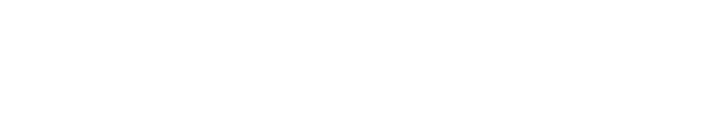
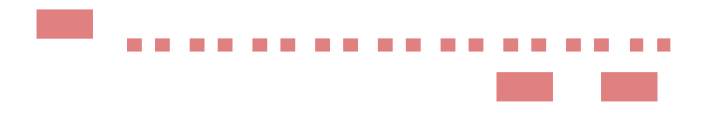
part: none -> (64, 24)
part: none -> (148, 44)
part: none -> (211, 44)
part: none -> (273, 44)
part: none -> (336, 44)
part: none -> (399, 44)
part: none -> (462, 44)
part: none -> (524, 44)
part: none -> (587, 44)
part: none -> (650, 44)
part: none -> (524, 86)
part: none -> (629, 86)

